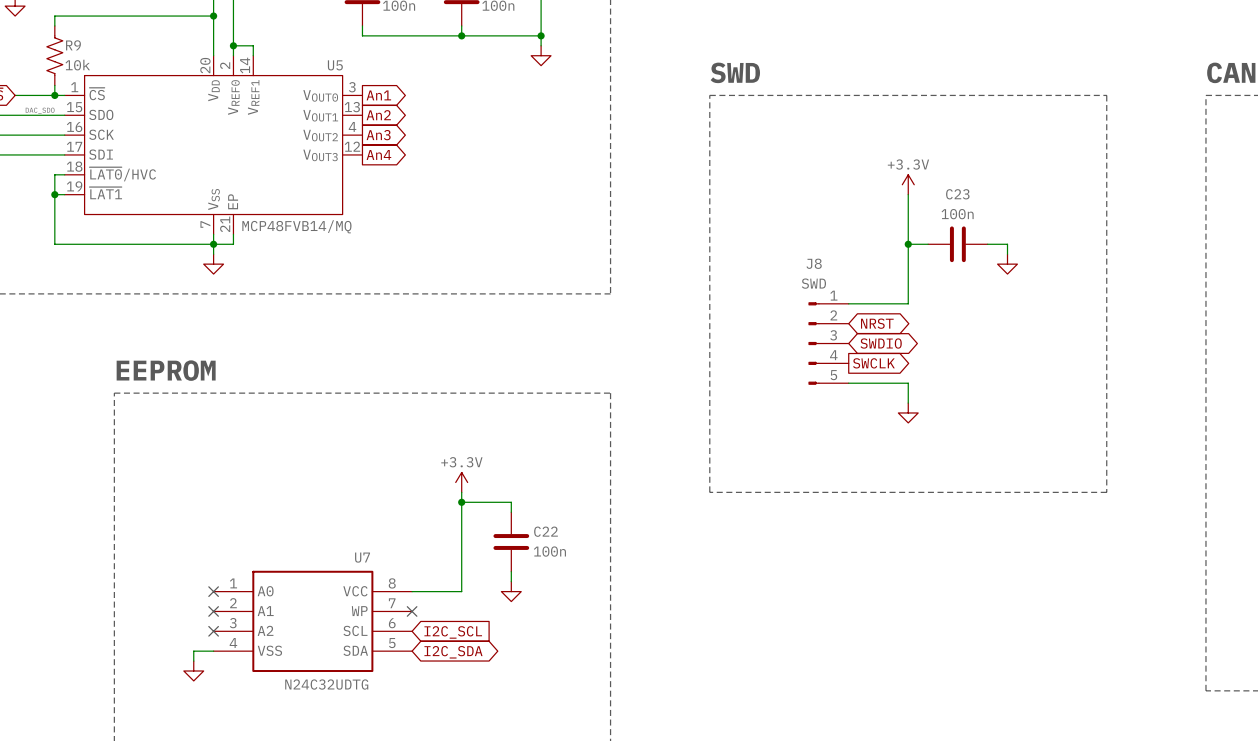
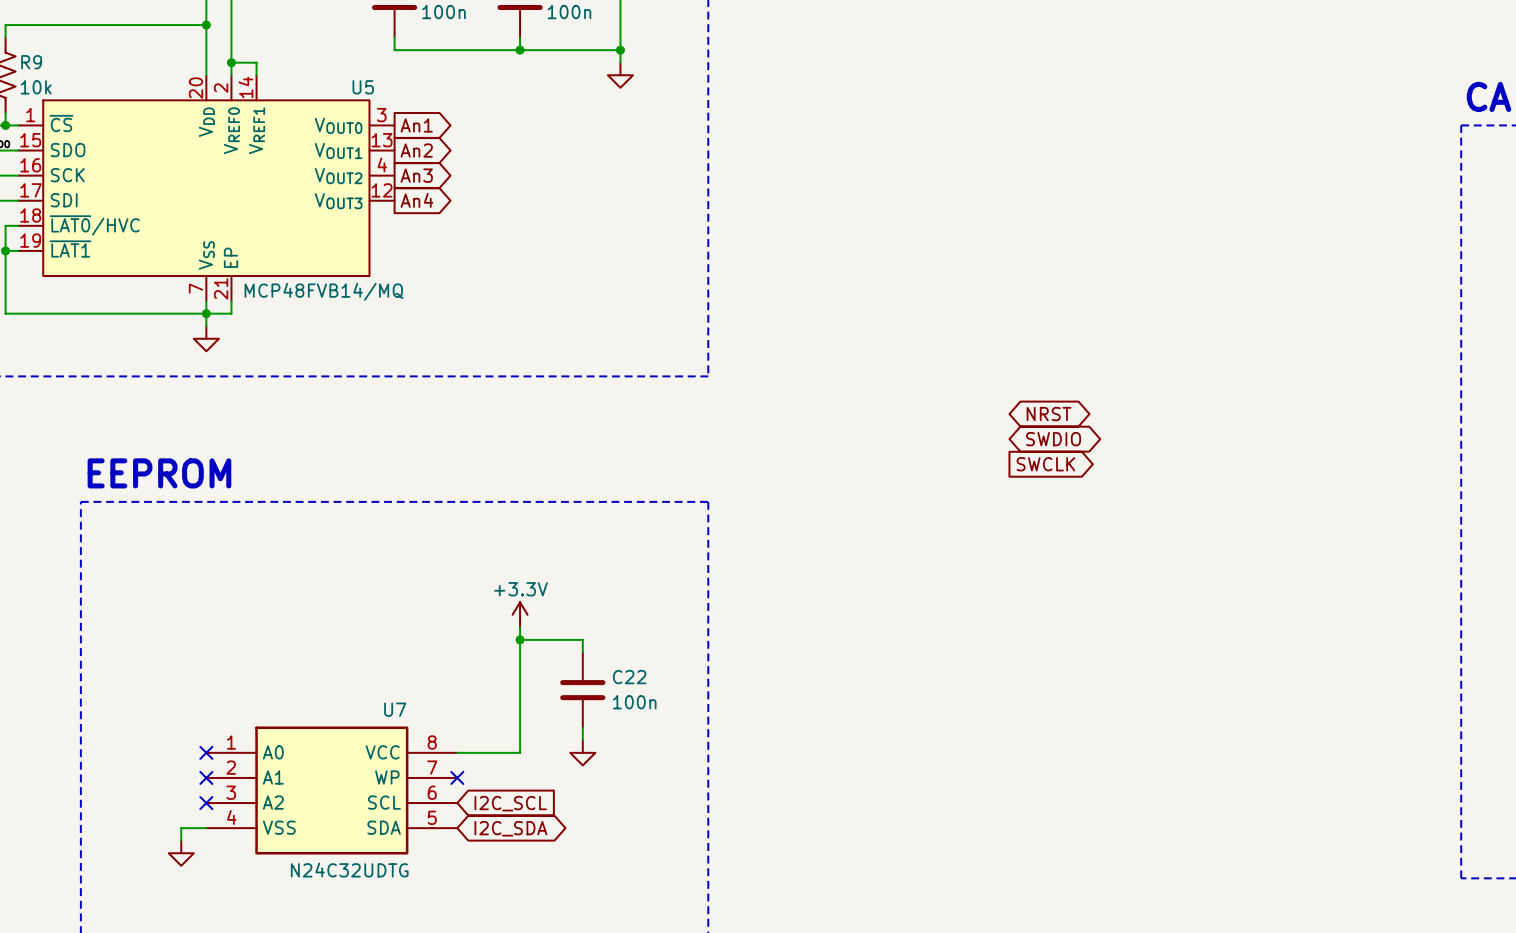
text: SWD (735, 72) -> none
line: (709, 95) (1106, 95) (1106, 492) (709, 492) (709, 95) -> none
power symbol: +3.3V (908, 184) -> none
wire: (908, 194) (908, 303) (848, 303) -> none
wire: (908, 244) (928, 244) -> none
junction: (908, 244) -> none
C23: 100n (957, 244) -> none
wire: (987, 244) (1007, 244) (1007, 254) -> none
power symbol: (1007, 264) -> none
J8: SWD (828, 343) -> none
wire: (848, 383) (908, 383) (908, 403) -> none
power symbol: (908, 412) -> none

